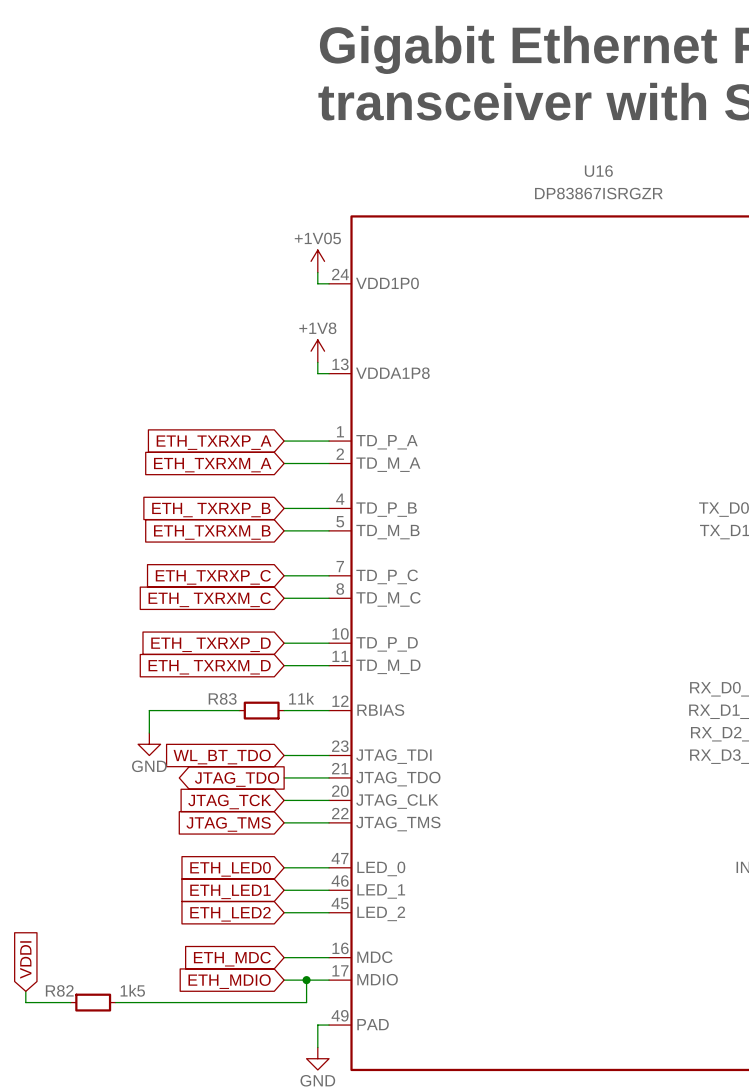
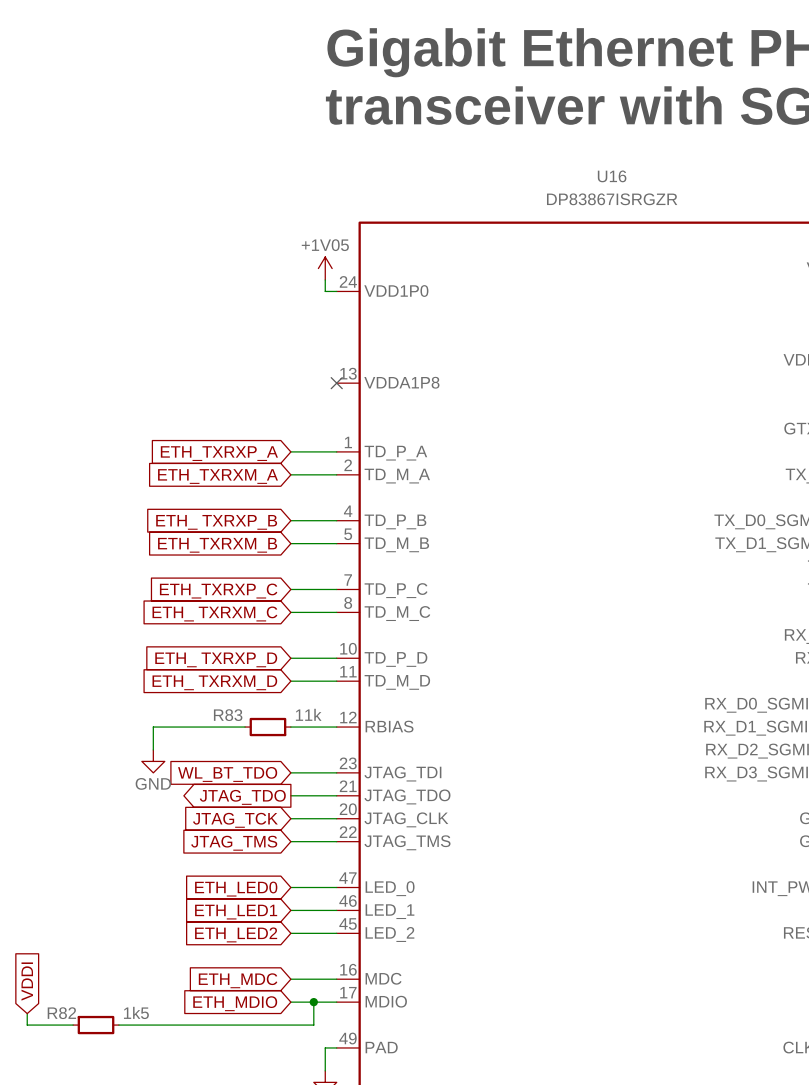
power symbol: +1V8 (317, 351) -> none
wire: (317, 362) (317, 373) (329, 373) -> none
no-connect mark: none -> (336, 383)

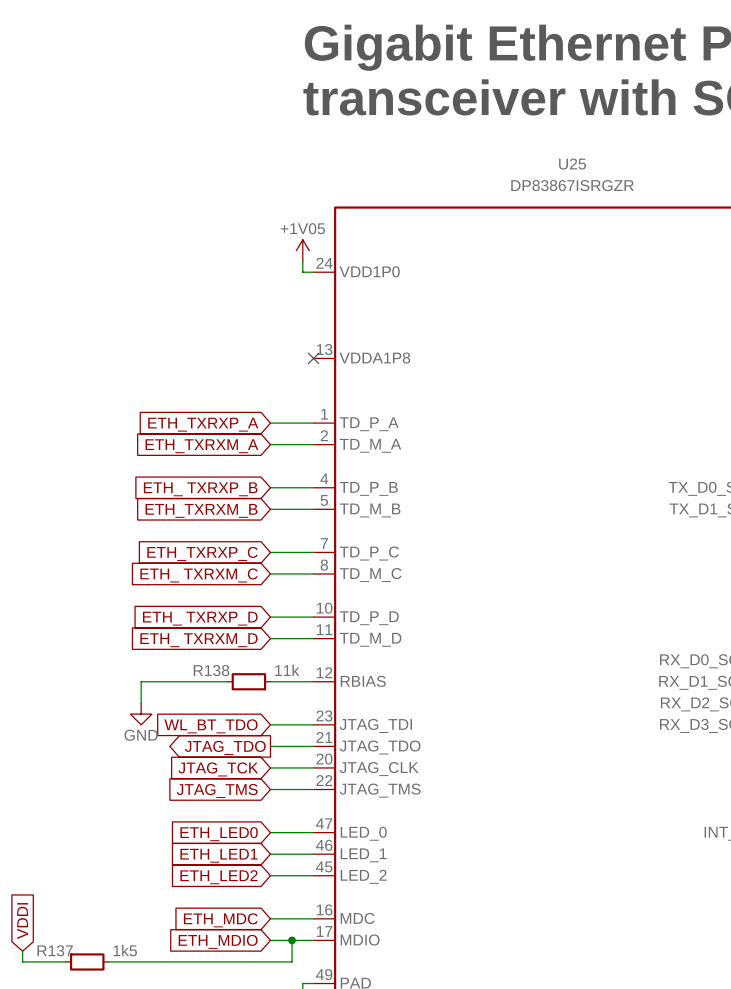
U16 name: U16 (612, 176) -> U25 (572, 164)
R83 name: R83 (228, 715) -> R138 (211, 670)
R82 name: R82 (61, 1013) -> R137 (55, 950)

